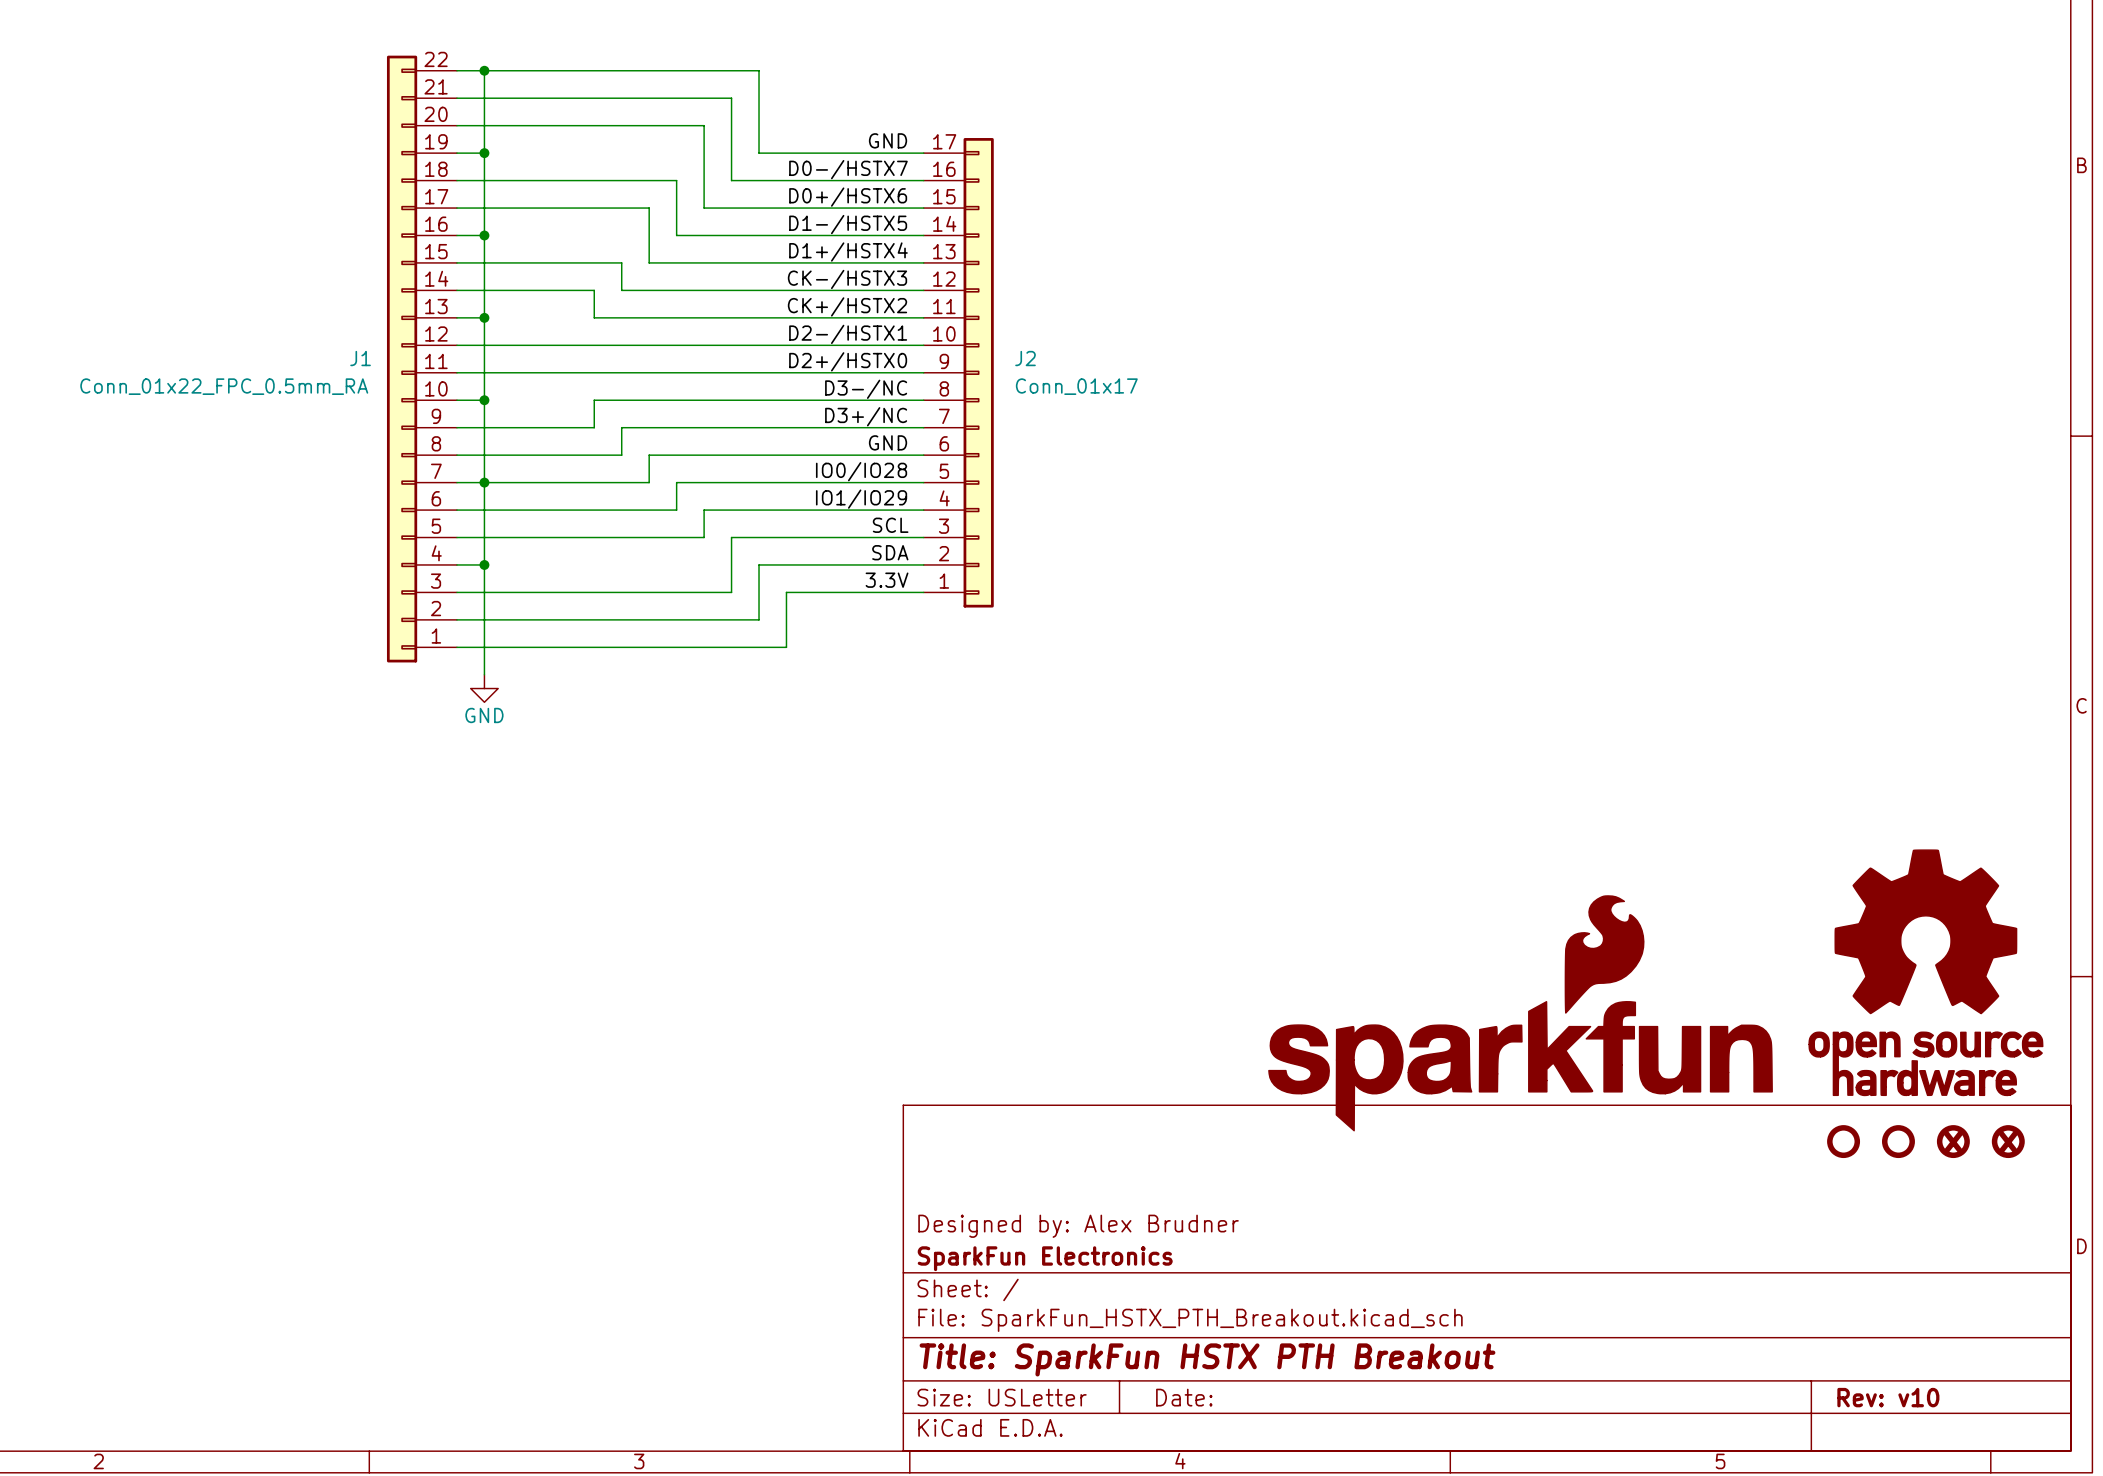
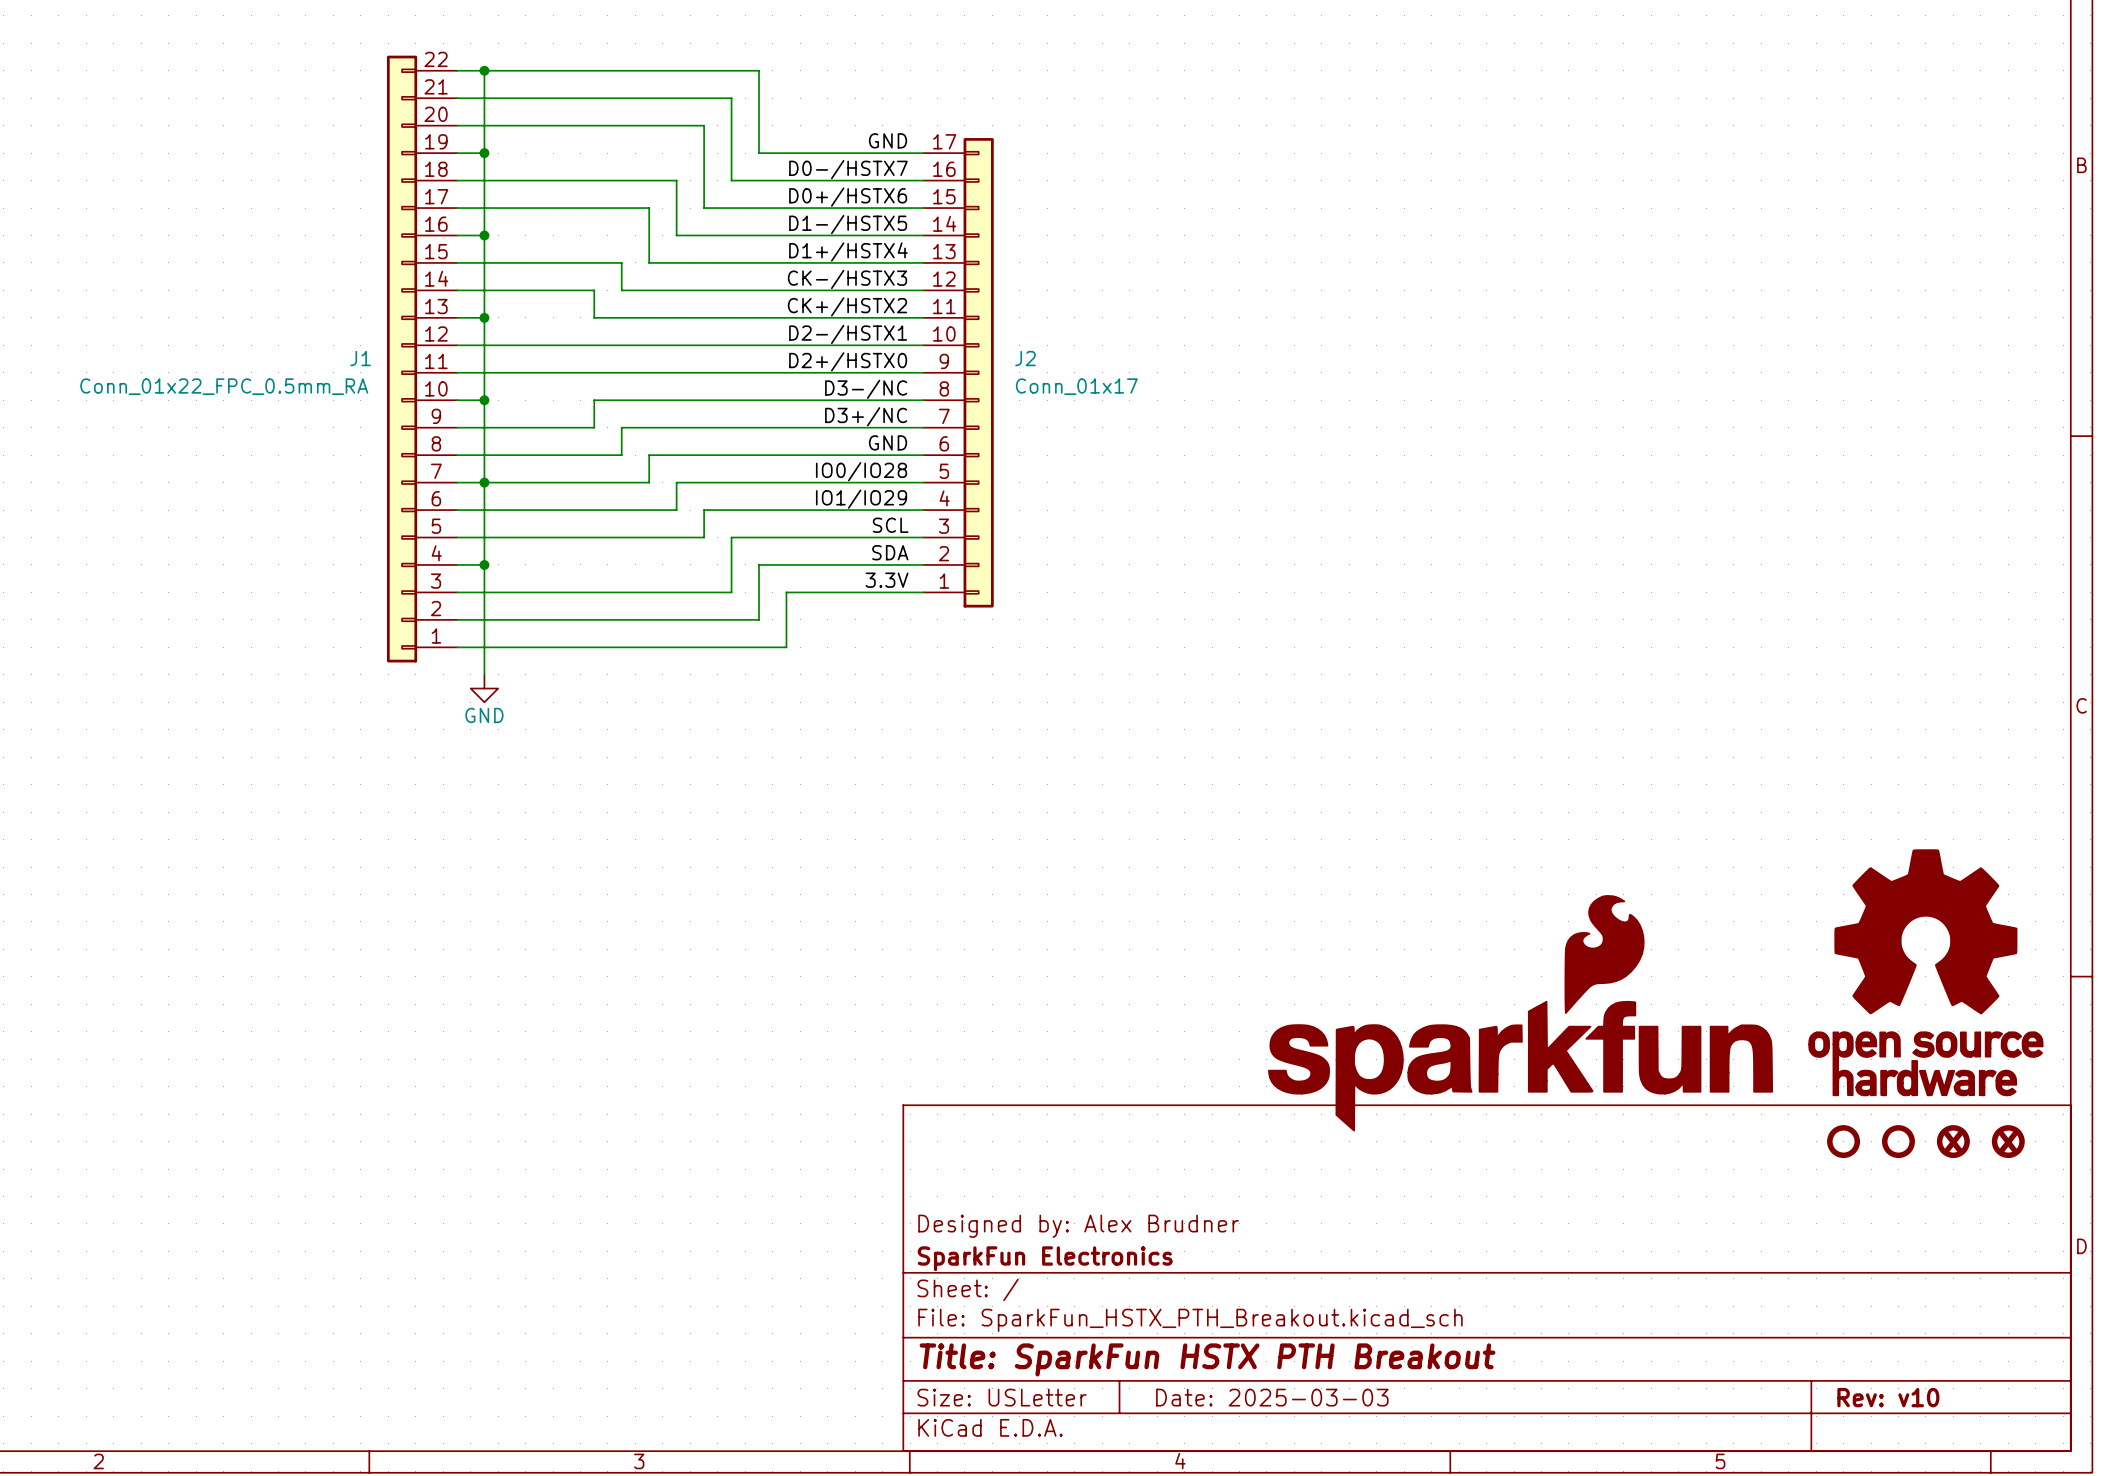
title block: Date: (1184, 1397) -> Date: 2025-03-03 (1272, 1397)

